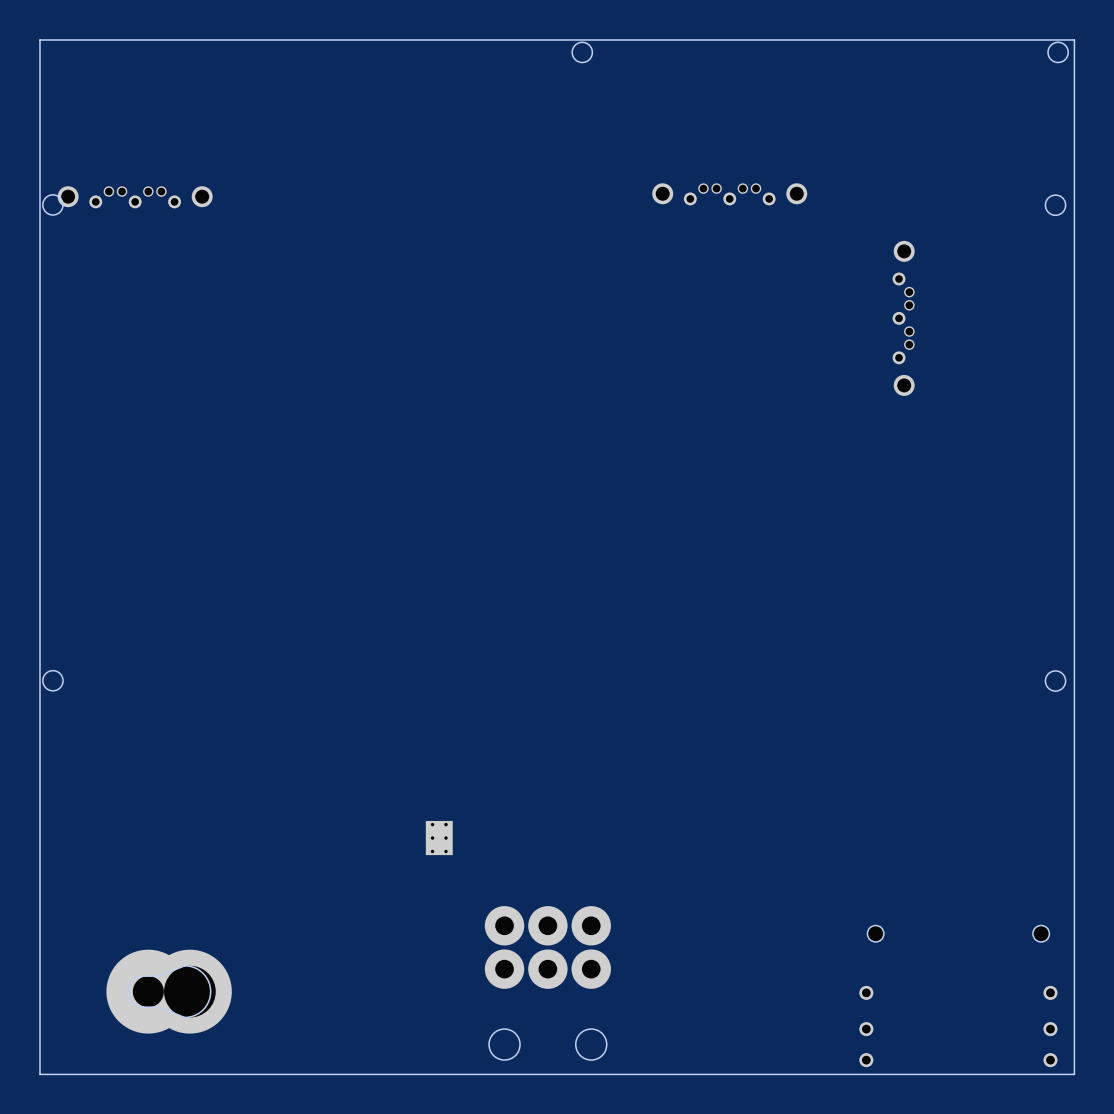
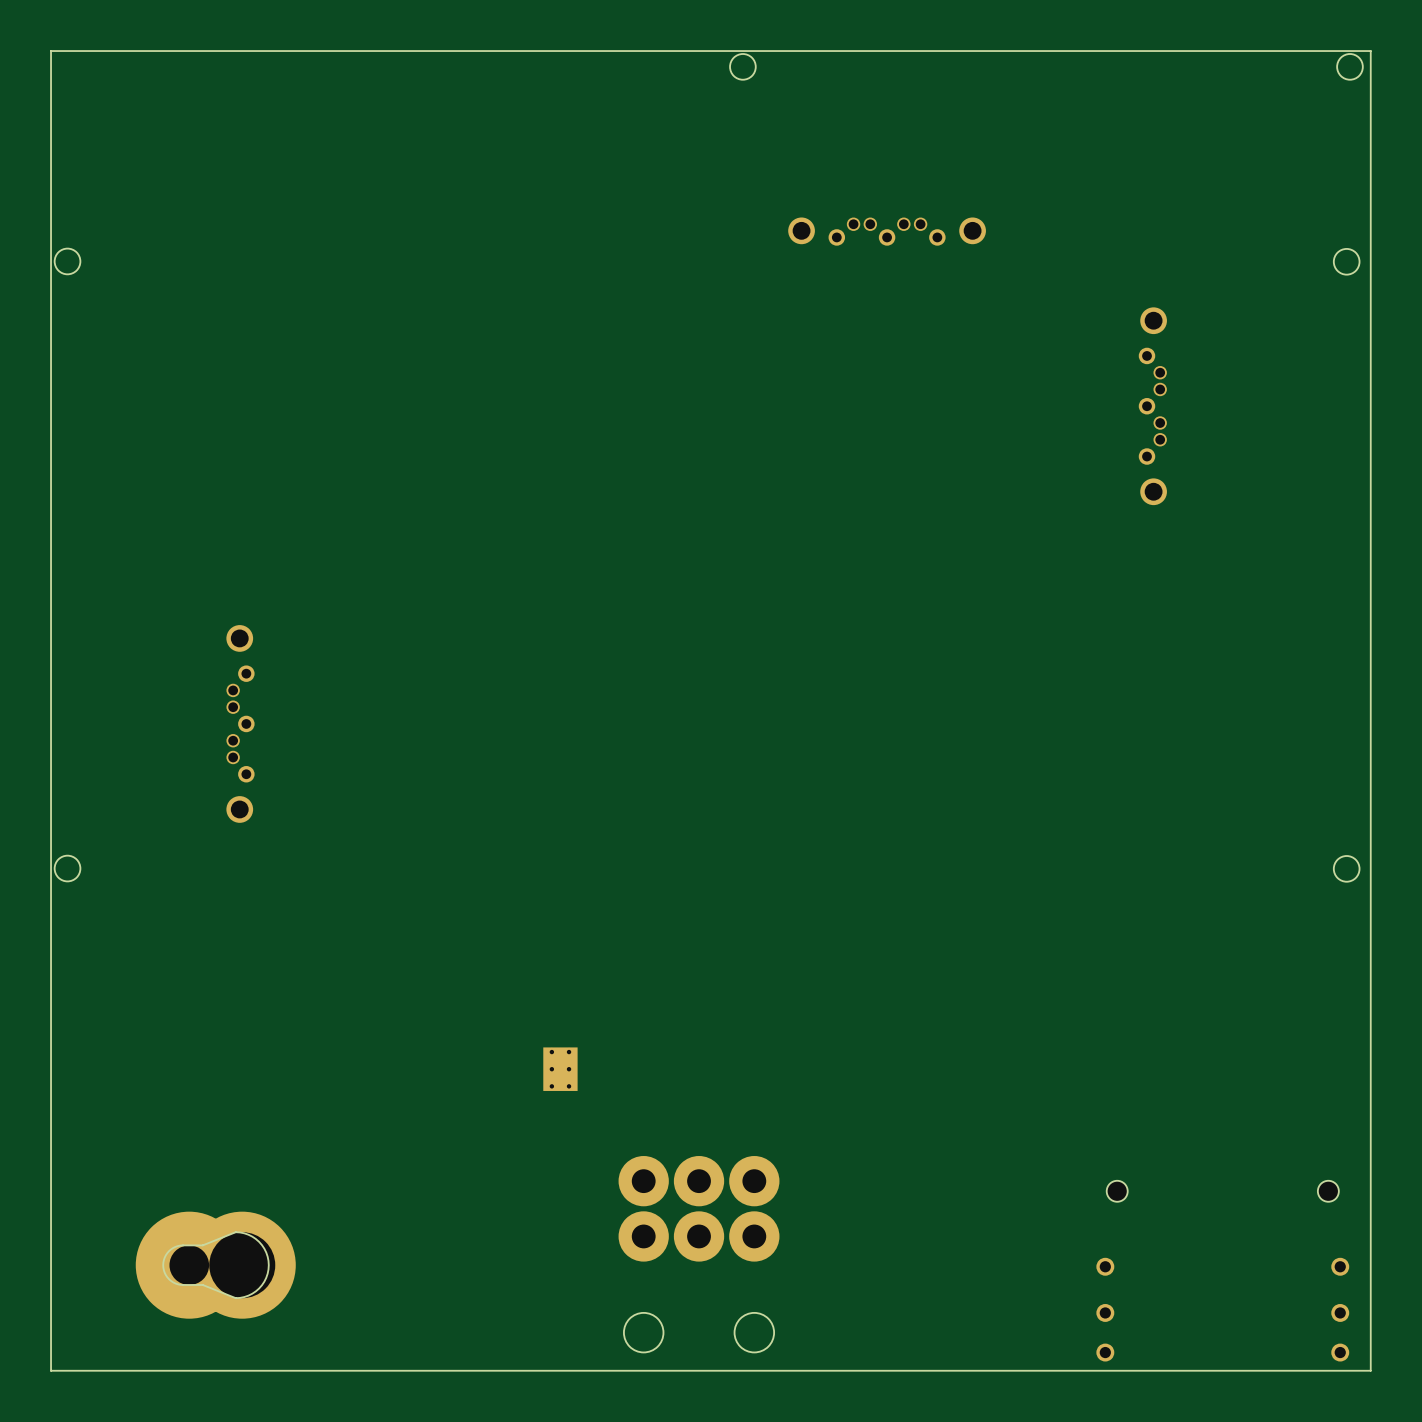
part position: (729, 194) -> (887, 231)
part: (135, 197) -> none
part: none -> (240, 723)

